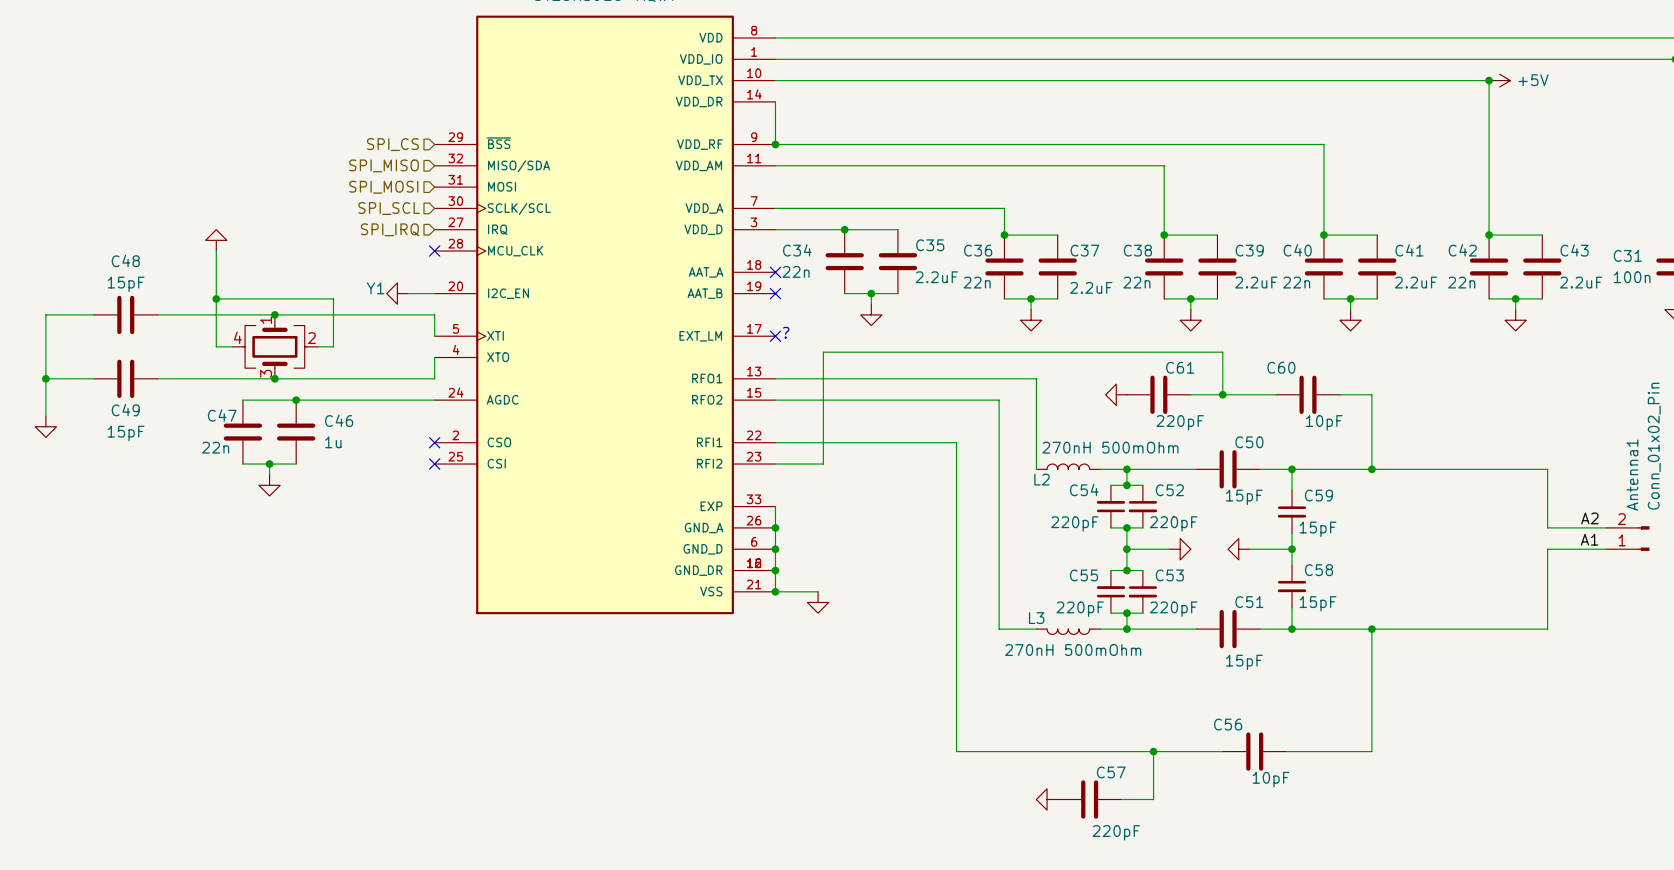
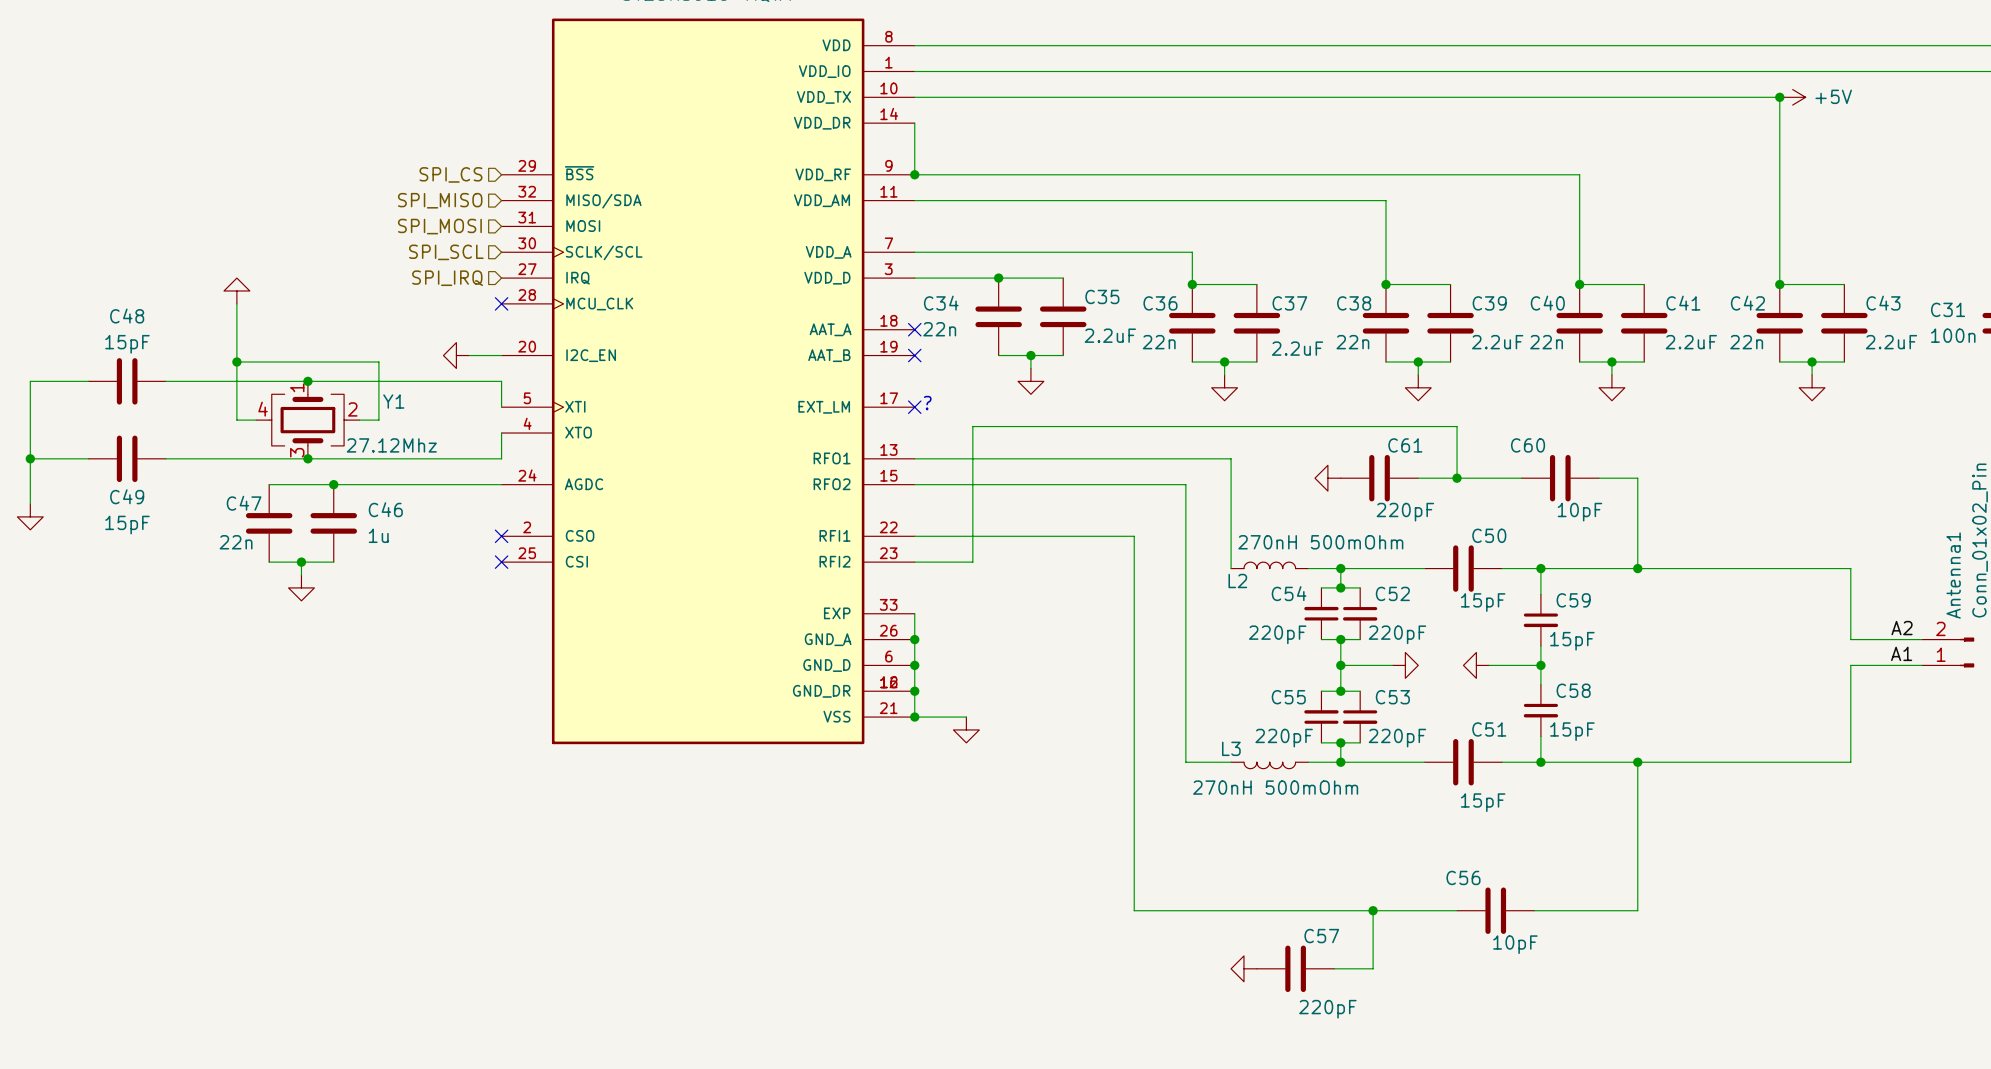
Y1 name position: Y1 (375, 288) -> Y1 (393, 401)
Y1 value: none -> 27.12Mhz (391, 445)

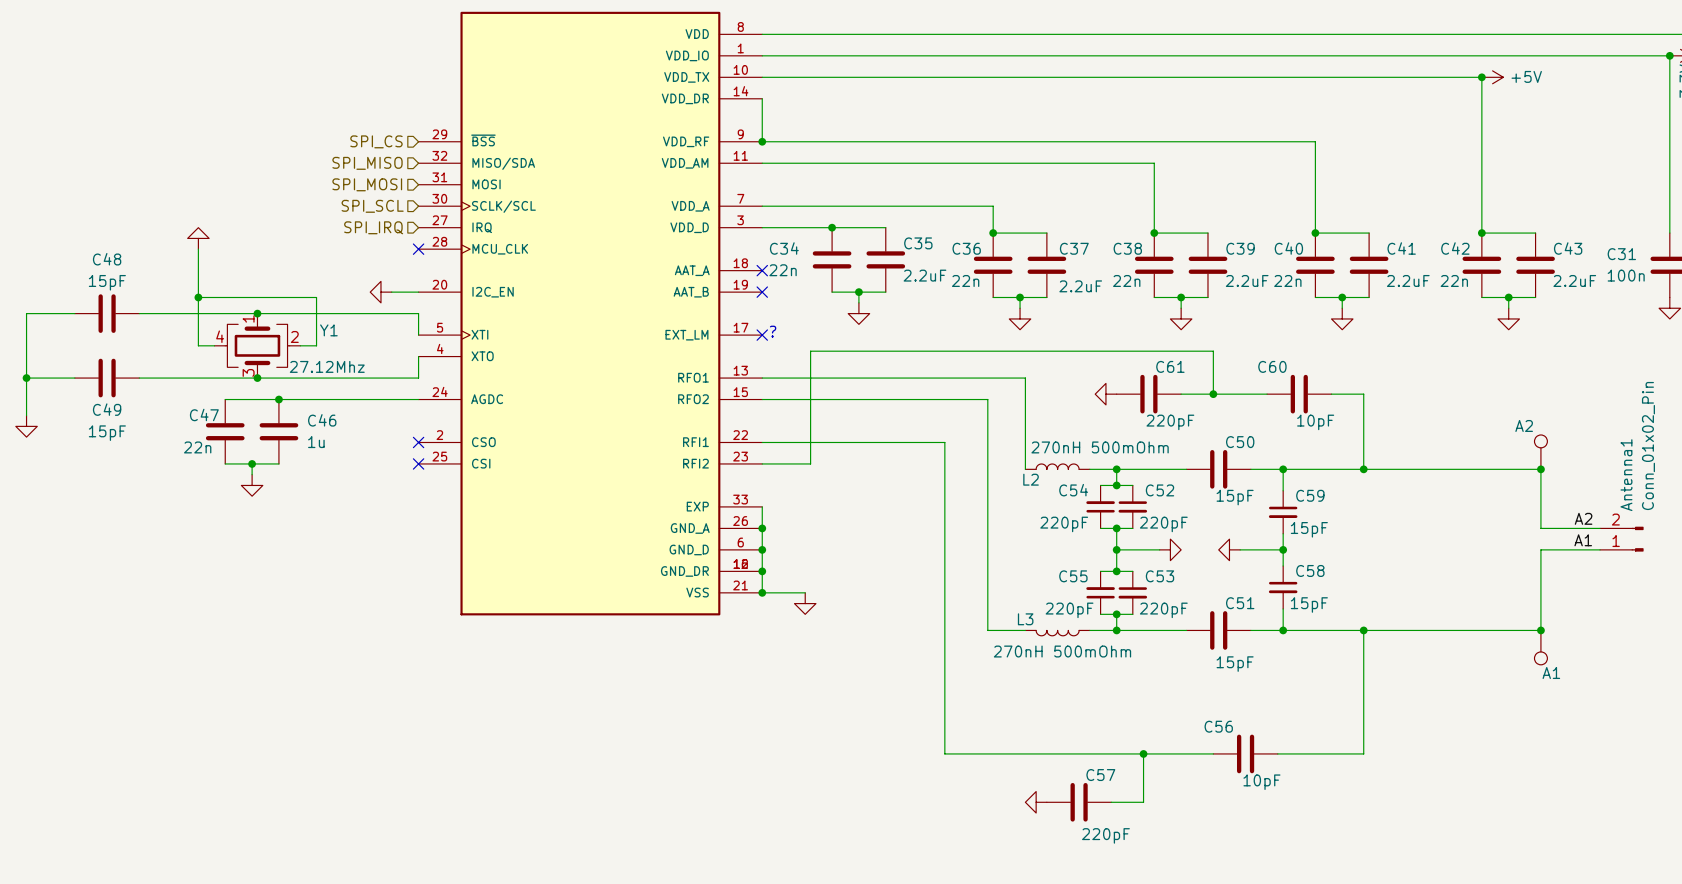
A2: none -> (1540, 452)
junction: none -> (1540, 469)
junction: none -> (1540, 630)
A1: none -> (1540, 647)

